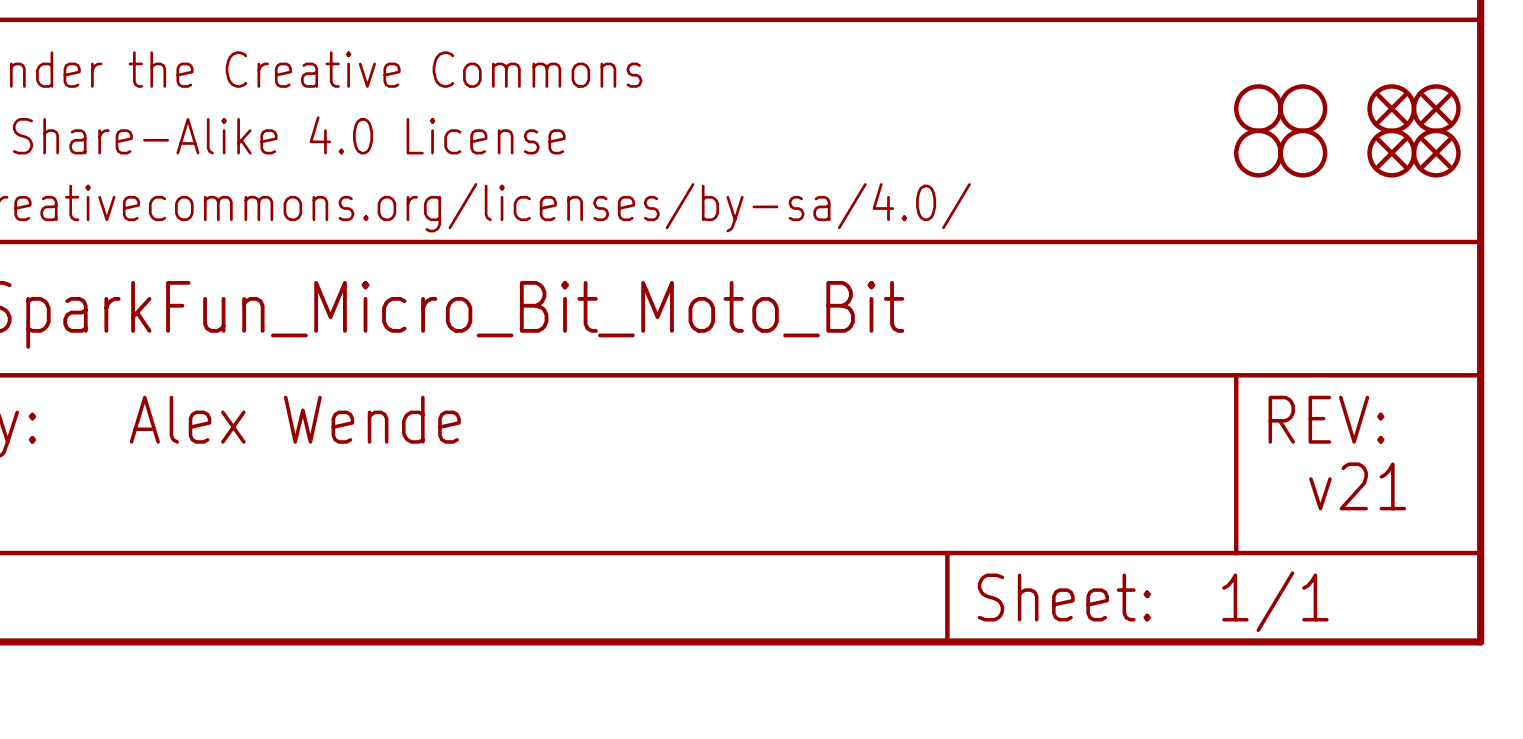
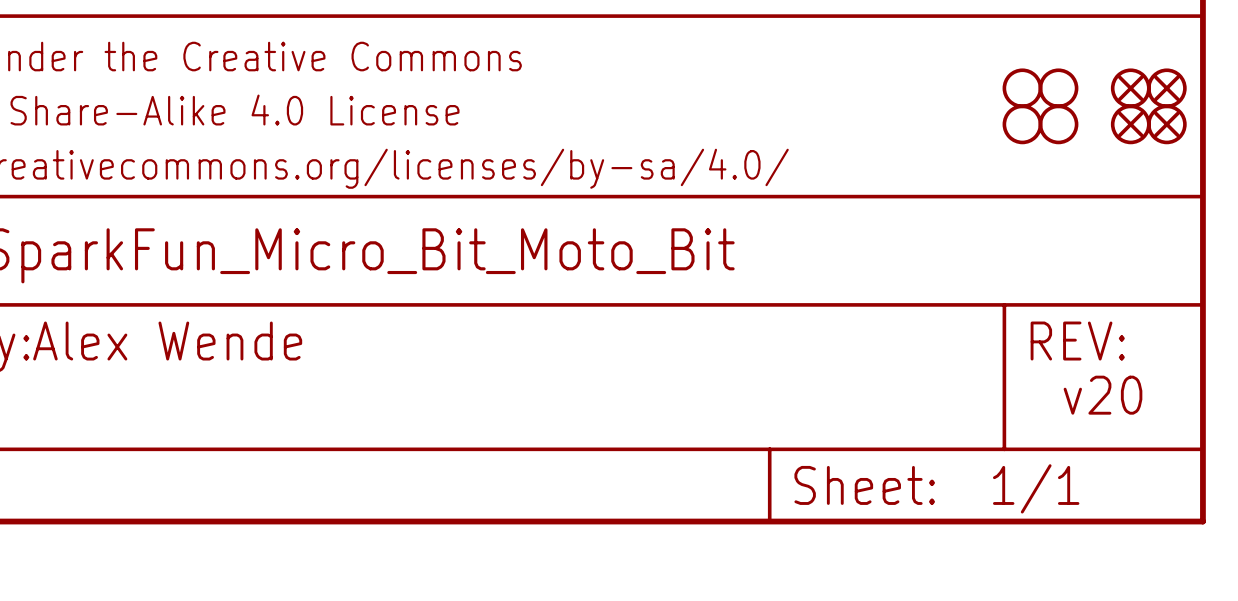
text position: Alex Wende (295, 419) -> Alex Wende (167, 341)
text: v21 (1357, 486) -> v20 (1102, 395)

